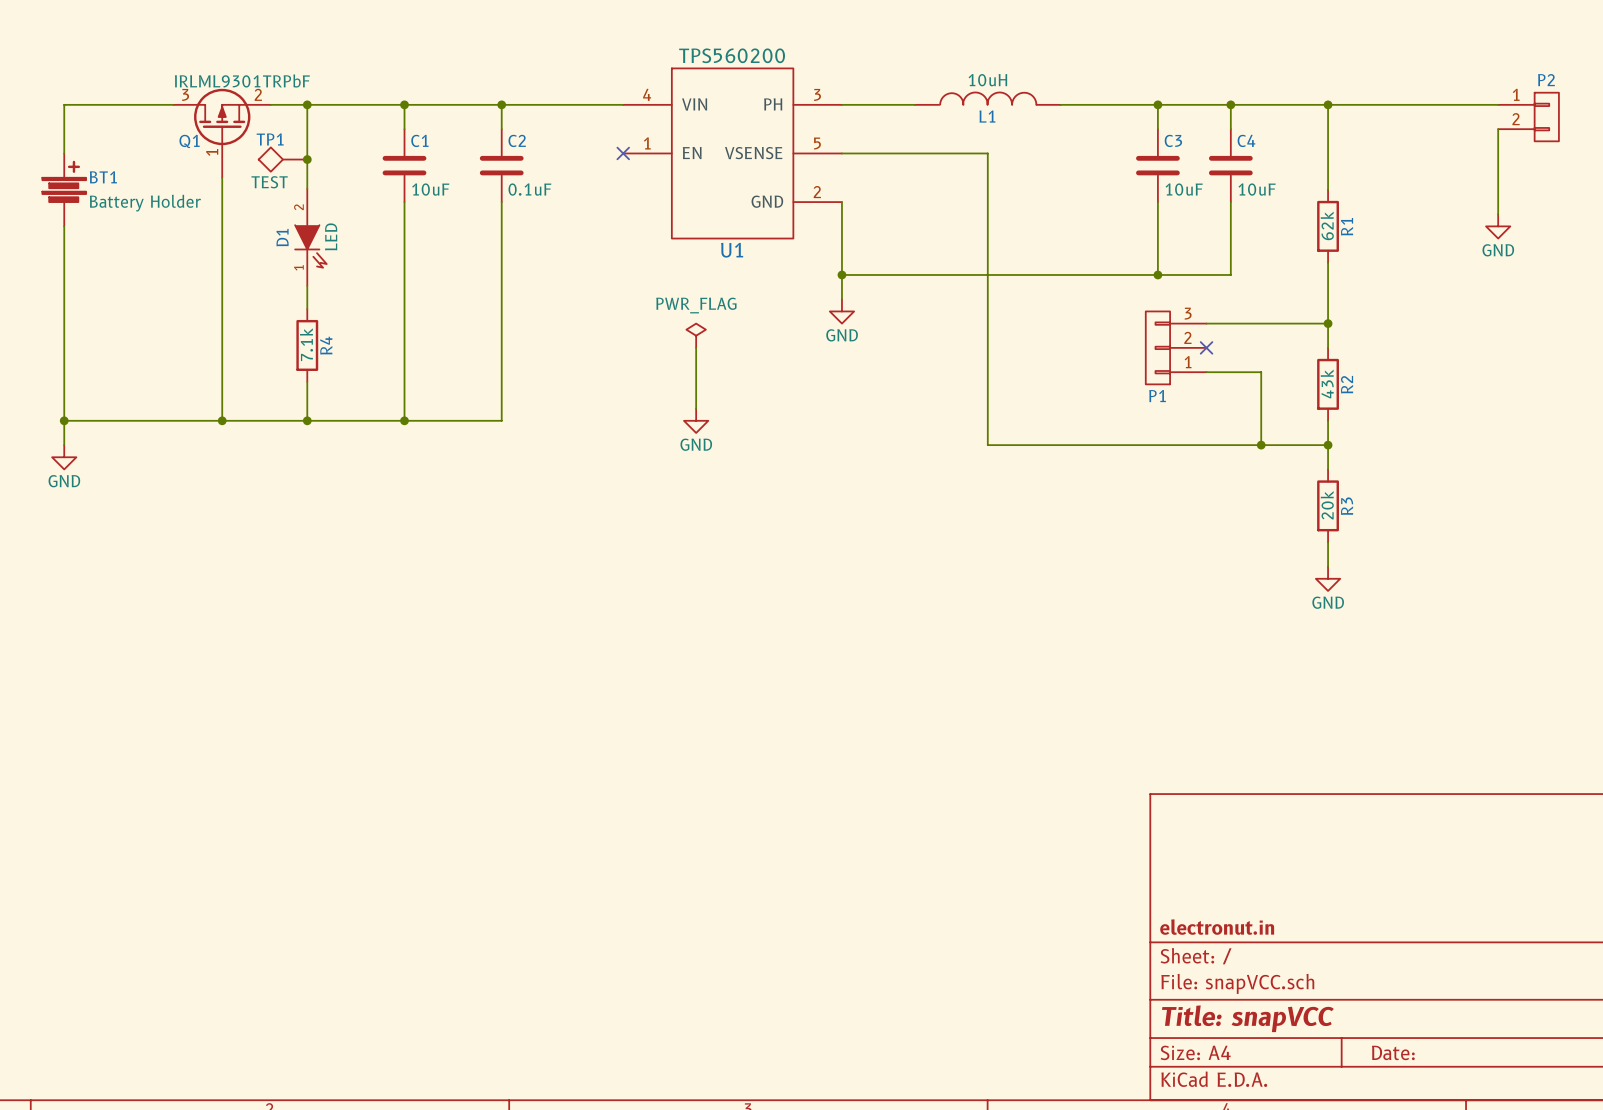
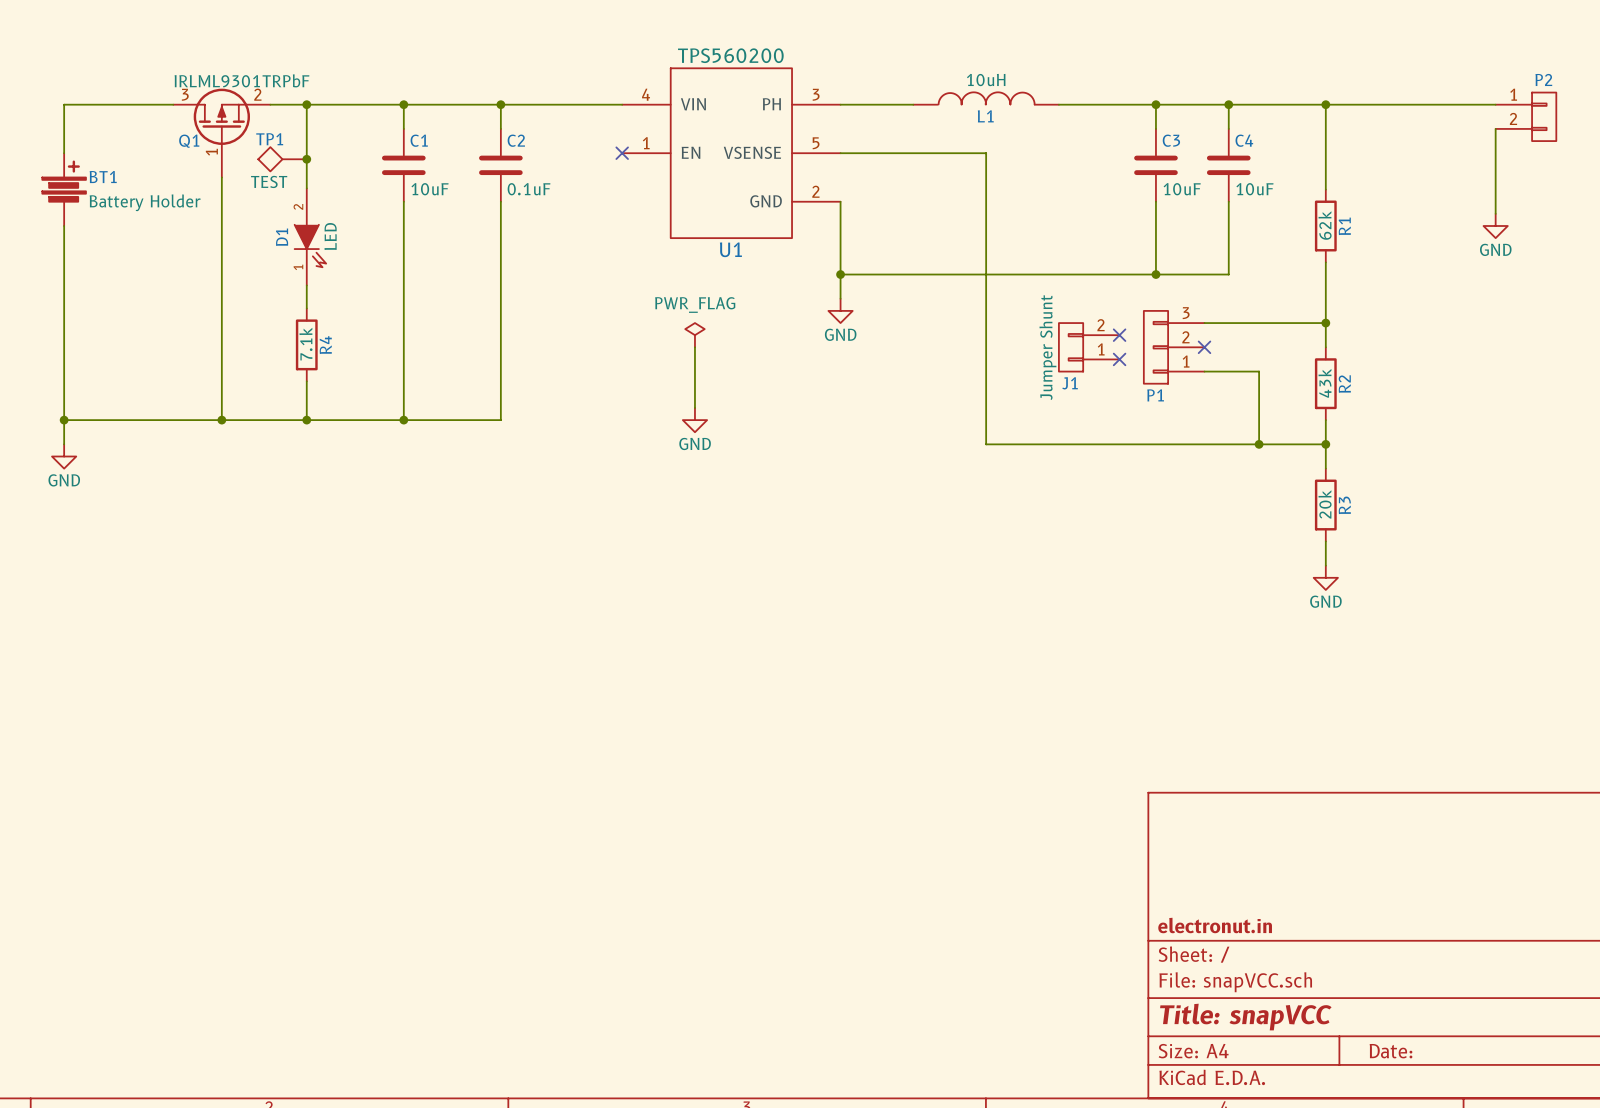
no-connect mark: none -> (1119, 335)
J1: none -> Jumper Shunt (1089, 347)
no-connect mark: none -> (1119, 359)

